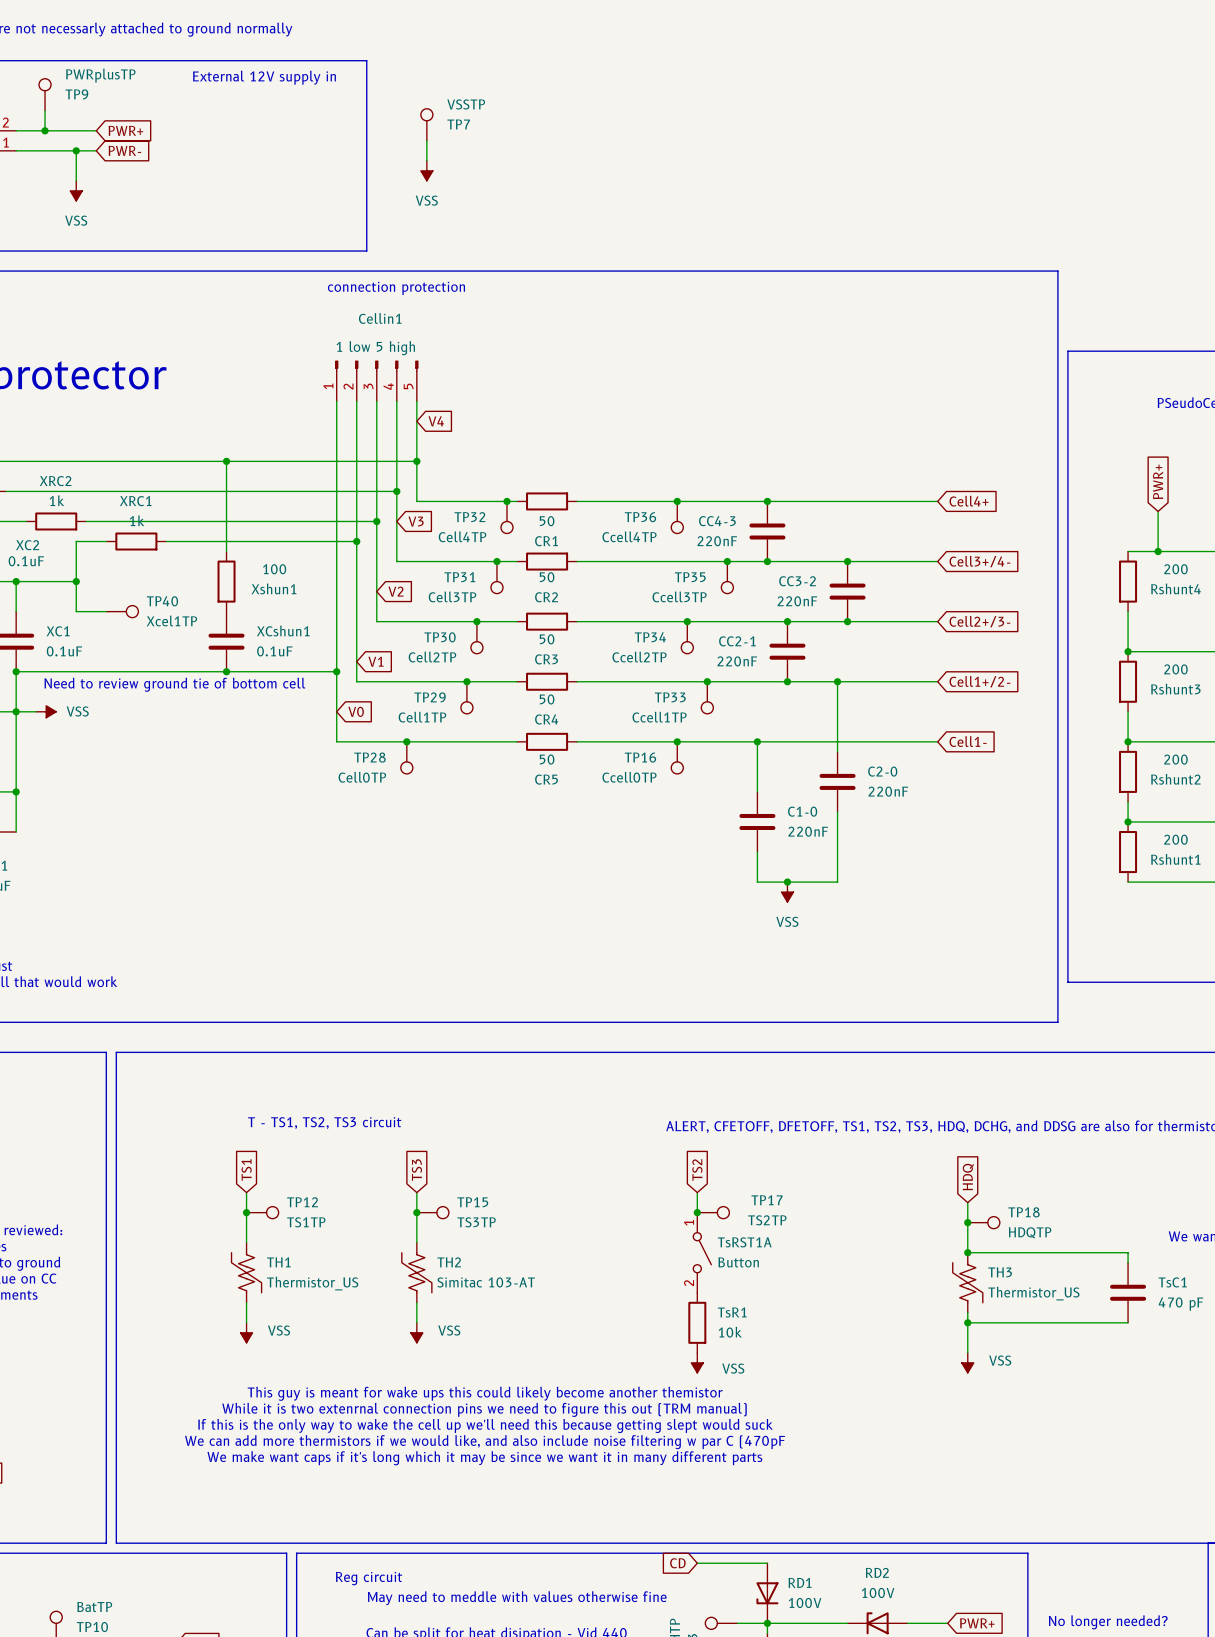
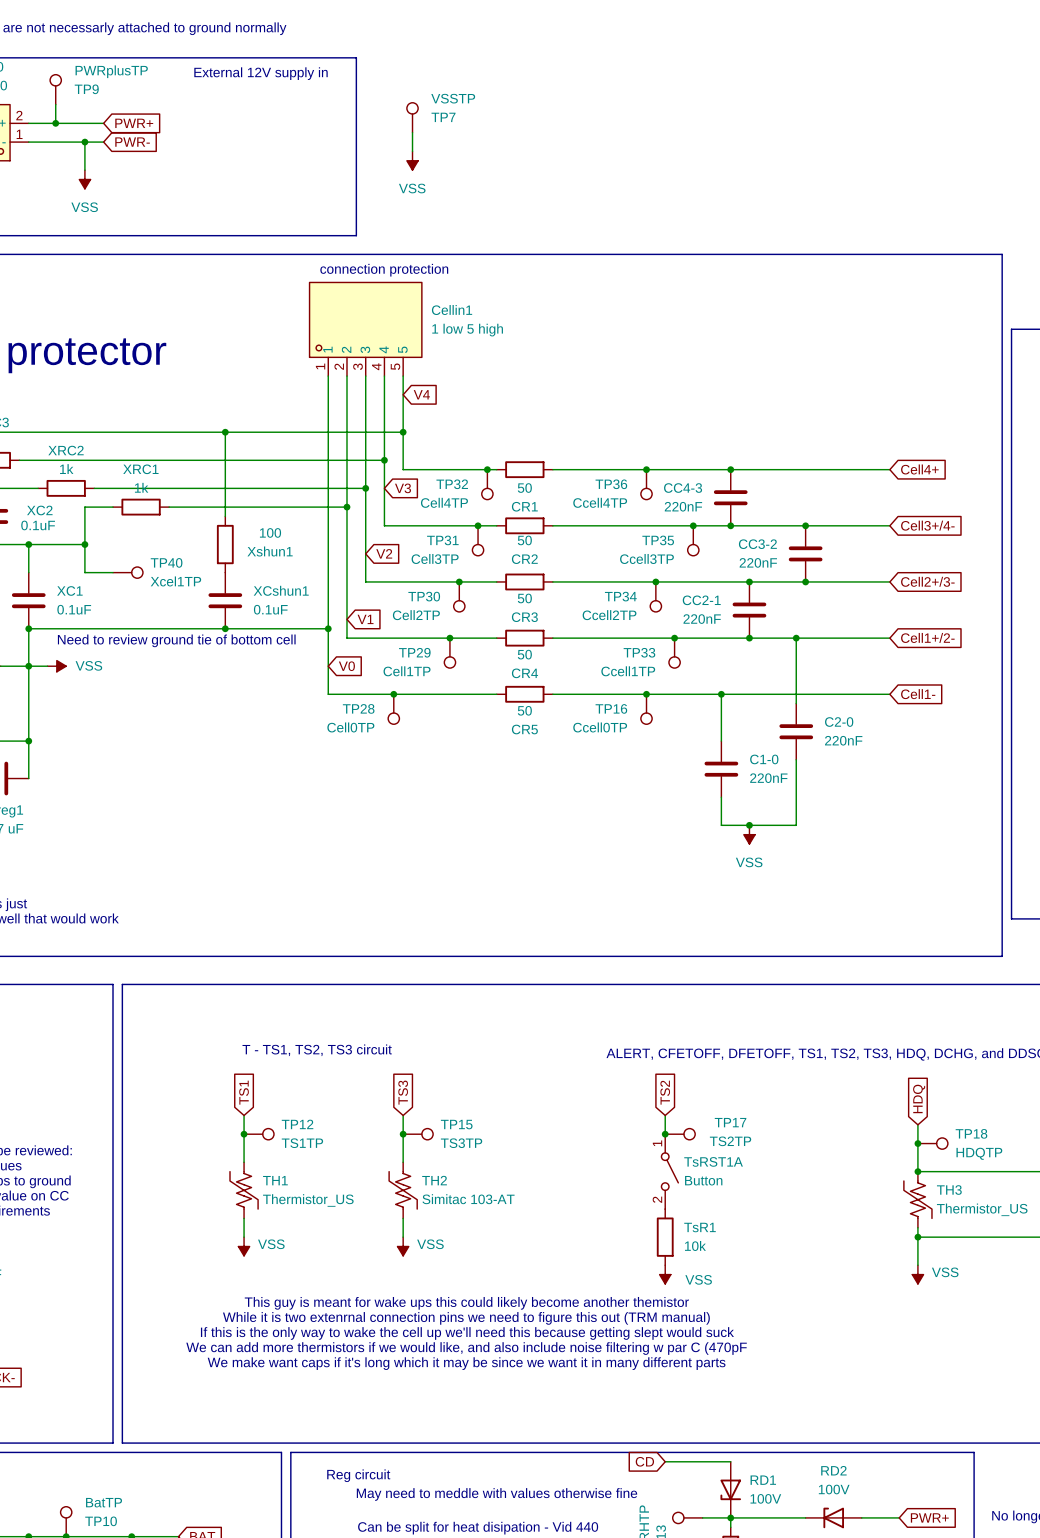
Cellin1 name position: Cellin1 (380, 318) -> Cellin1 (452, 310)
Cellin1 value position: 1 low 5 high (375, 348) -> 1 low 5 high (467, 330)
Cellin1 symbol: [335, 360, 419, 402] -> [309, 282, 422, 377]

